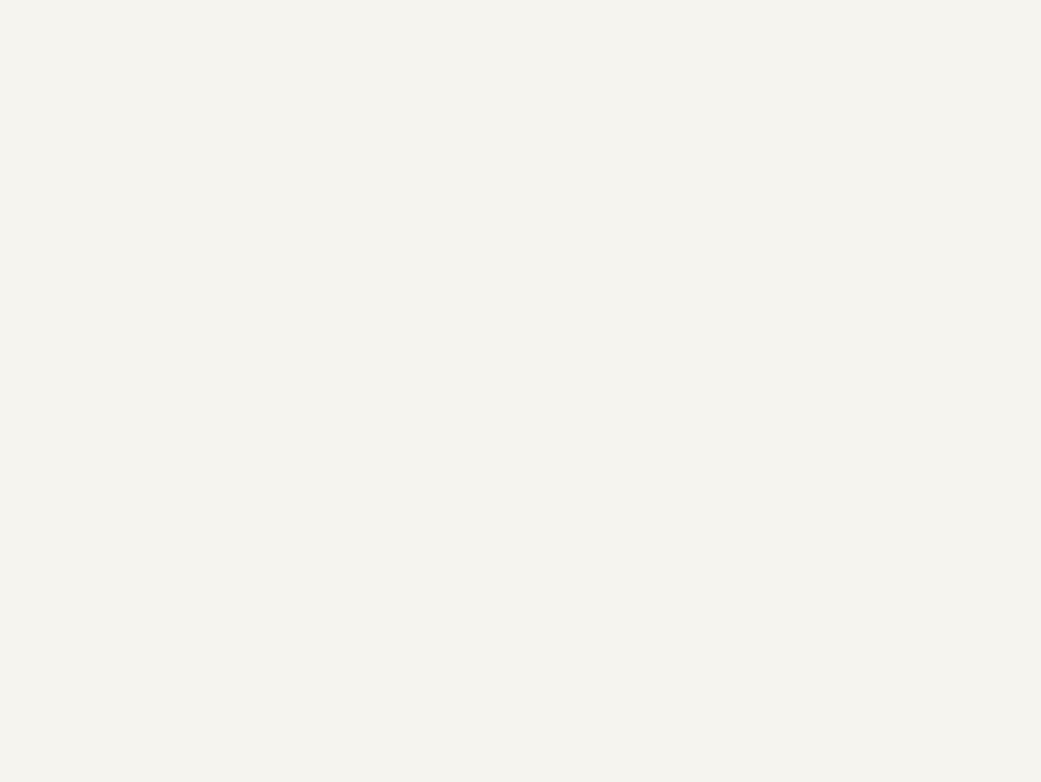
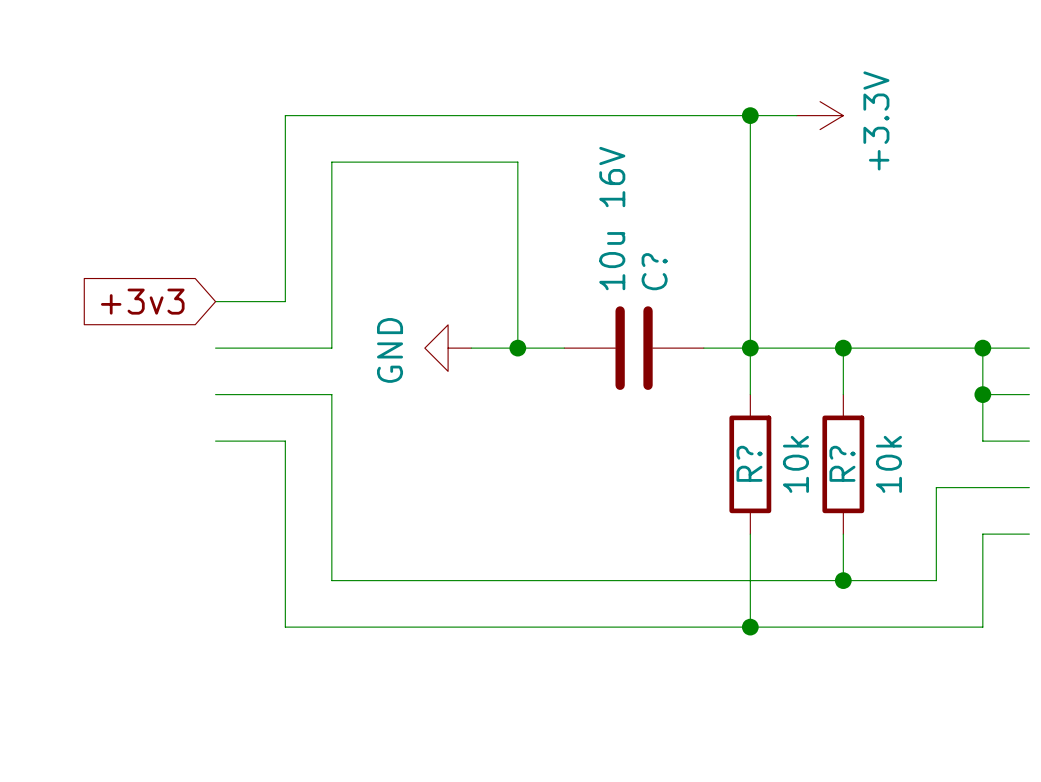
wire: none -> (750, 115) (750, 394)
junction: none -> (750, 115)
wire: none -> (796, 115) (285, 115) (285, 301) (215, 301)
power symbol: none -> +3.3V (820, 115)
global label: none -> +3v3 (142, 301)
wire: none -> (215, 348) (331, 348) (331, 162) (517, 162) (517, 348)
power symbol: none -> GND (448, 348)
wire: none -> (471, 348) (564, 348)
junction: none -> (517, 348)
C?: none -> 10u 16V (634, 348)
wire: none -> (703, 348) (1029, 348)
junction: none -> (750, 348)
wire: none -> (843, 348) (843, 394)
junction: none -> (843, 348)
wire: none -> (982, 348) (982, 441) (1029, 441)
junction: none -> (982, 348)
wire: none -> (215, 394) (331, 394) (331, 580) (936, 580) (936, 487) (1029, 487)
wire: none -> (982, 394) (1029, 394)
junction: none -> (982, 394)
wire: none -> (215, 441) (285, 441) (285, 627) (982, 627) (982, 534) (1029, 534)
R?: none -> 10k (750, 464)
R?: none -> 10k (843, 464)
wire: none -> (750, 534) (750, 627)
wire: none -> (843, 534) (843, 580)
junction: none -> (843, 580)
junction: none -> (750, 627)

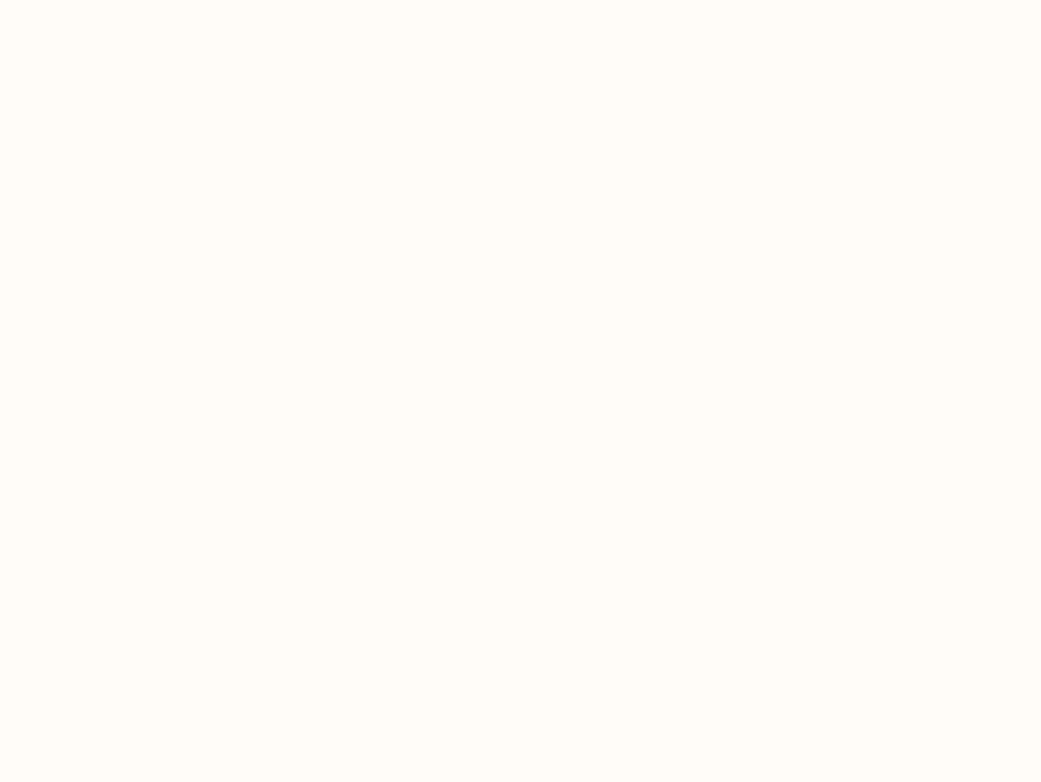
wire: (750, 115) (750, 394) -> none
junction: (750, 115) -> none
wire: (796, 115) (285, 115) (285, 301) (215, 301) -> none
power symbol: +3.3V (820, 115) -> none
global label: +3v3 (142, 301) -> none
wire: (215, 348) (331, 348) (331, 162) (517, 162) (517, 348) -> none
power symbol: GND (448, 348) -> none
wire: (471, 348) (564, 348) -> none
junction: (517, 348) -> none
C?: 10u 16V (634, 348) -> none
wire: (703, 348) (1029, 348) -> none
junction: (750, 348) -> none
wire: (843, 348) (843, 394) -> none
junction: (843, 348) -> none
wire: (982, 348) (982, 441) (1029, 441) -> none
junction: (982, 348) -> none
wire: (215, 394) (331, 394) (331, 580) (936, 580) (936, 487) (1029, 487) -> none
wire: (982, 394) (1029, 394) -> none
junction: (982, 394) -> none
wire: (215, 441) (285, 441) (285, 627) (982, 627) (982, 534) (1029, 534) -> none
R?: 10k (750, 464) -> none
R?: 10k (843, 464) -> none
wire: (750, 534) (750, 627) -> none
wire: (843, 534) (843, 580) -> none
junction: (843, 580) -> none
junction: (750, 627) -> none

